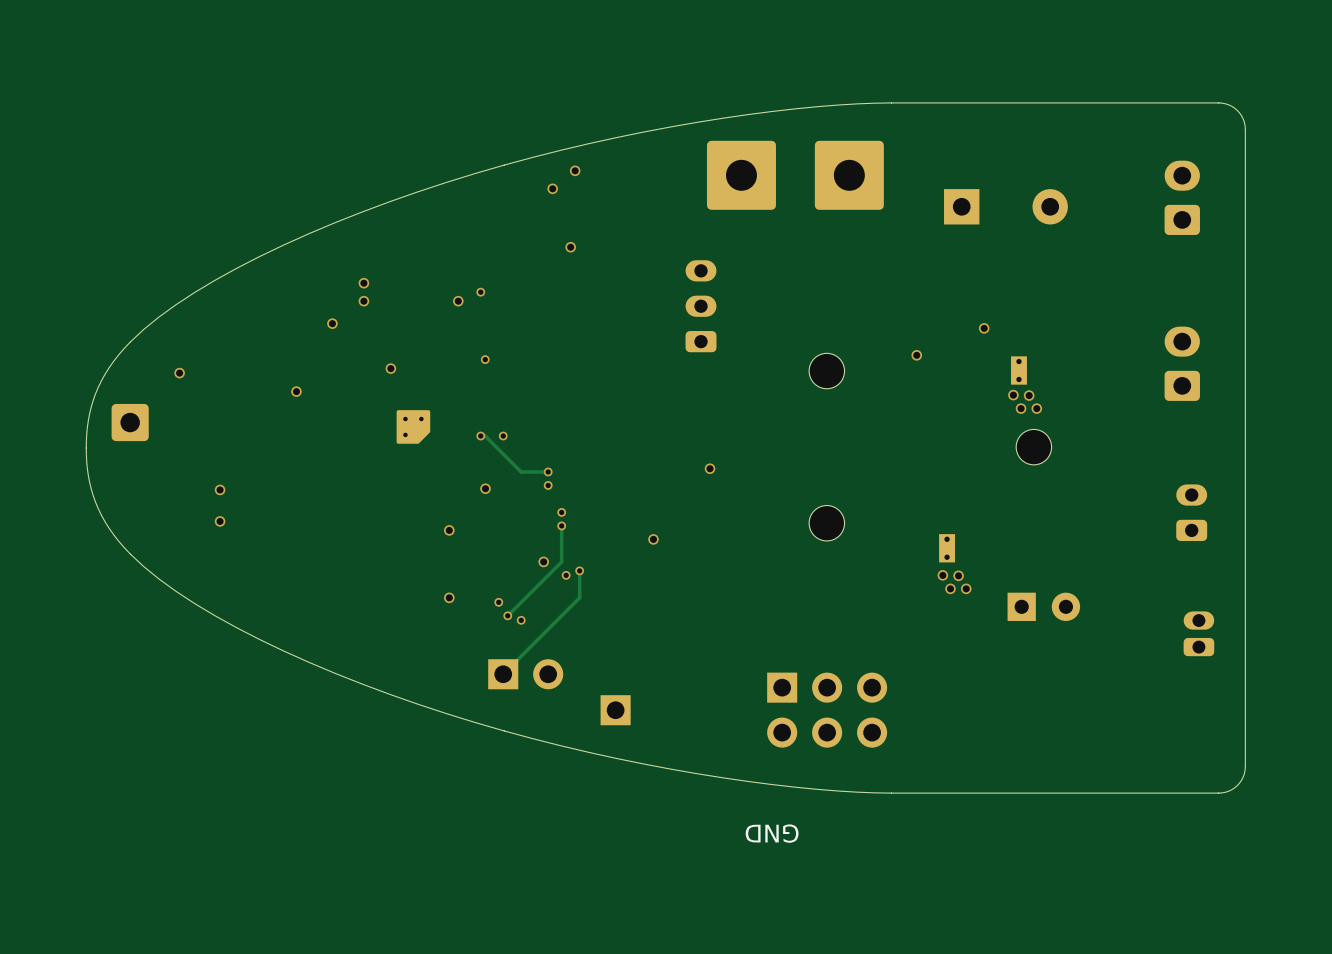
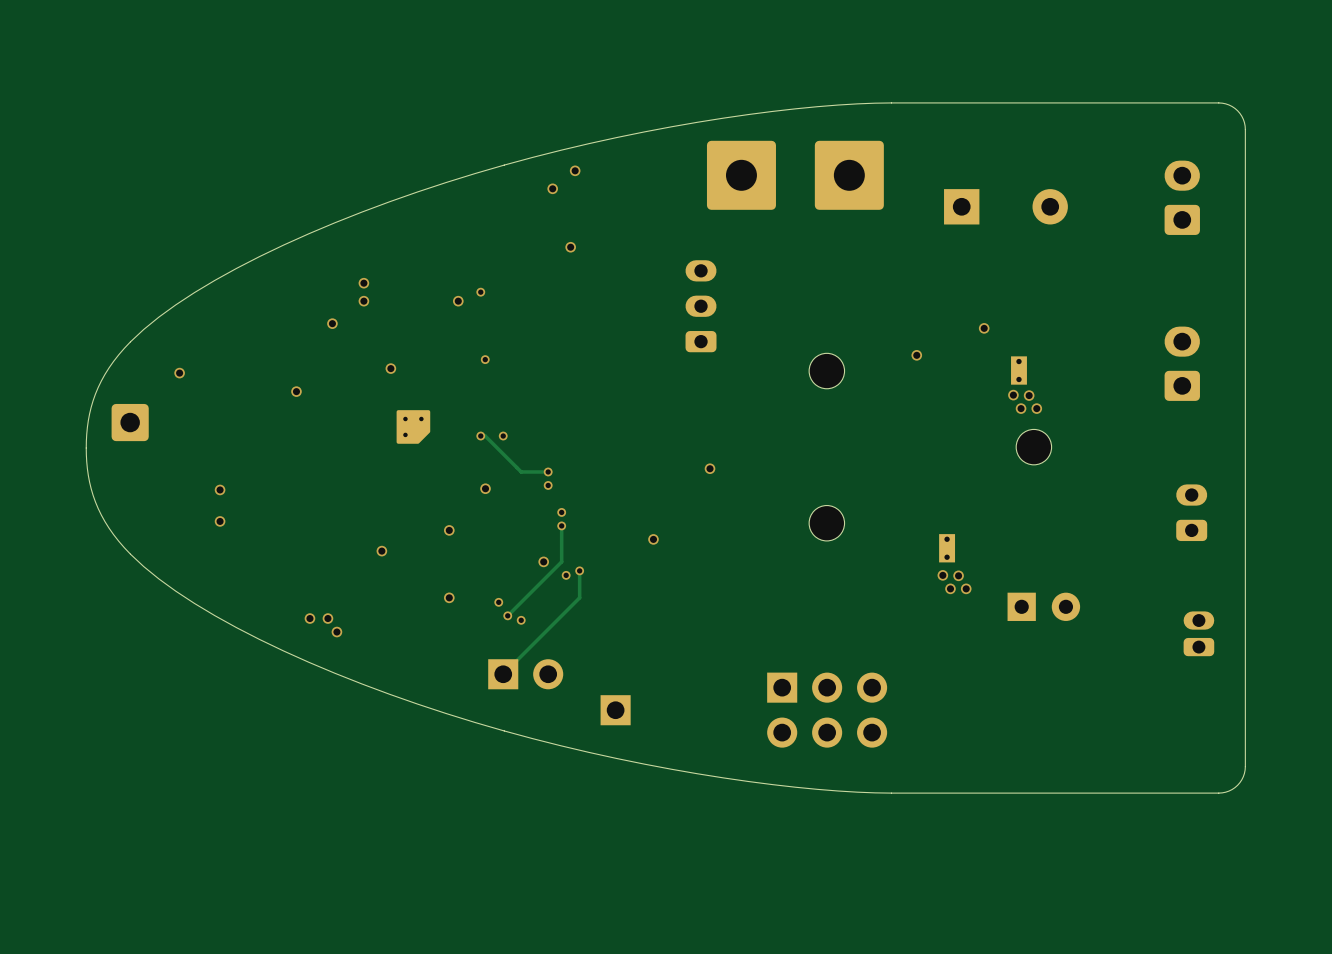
via: none -> (381, 551)
via: none -> (309, 618)
via: none -> (327, 618)
via: none -> (336, 632)
text: GND (772, 833) -> none

